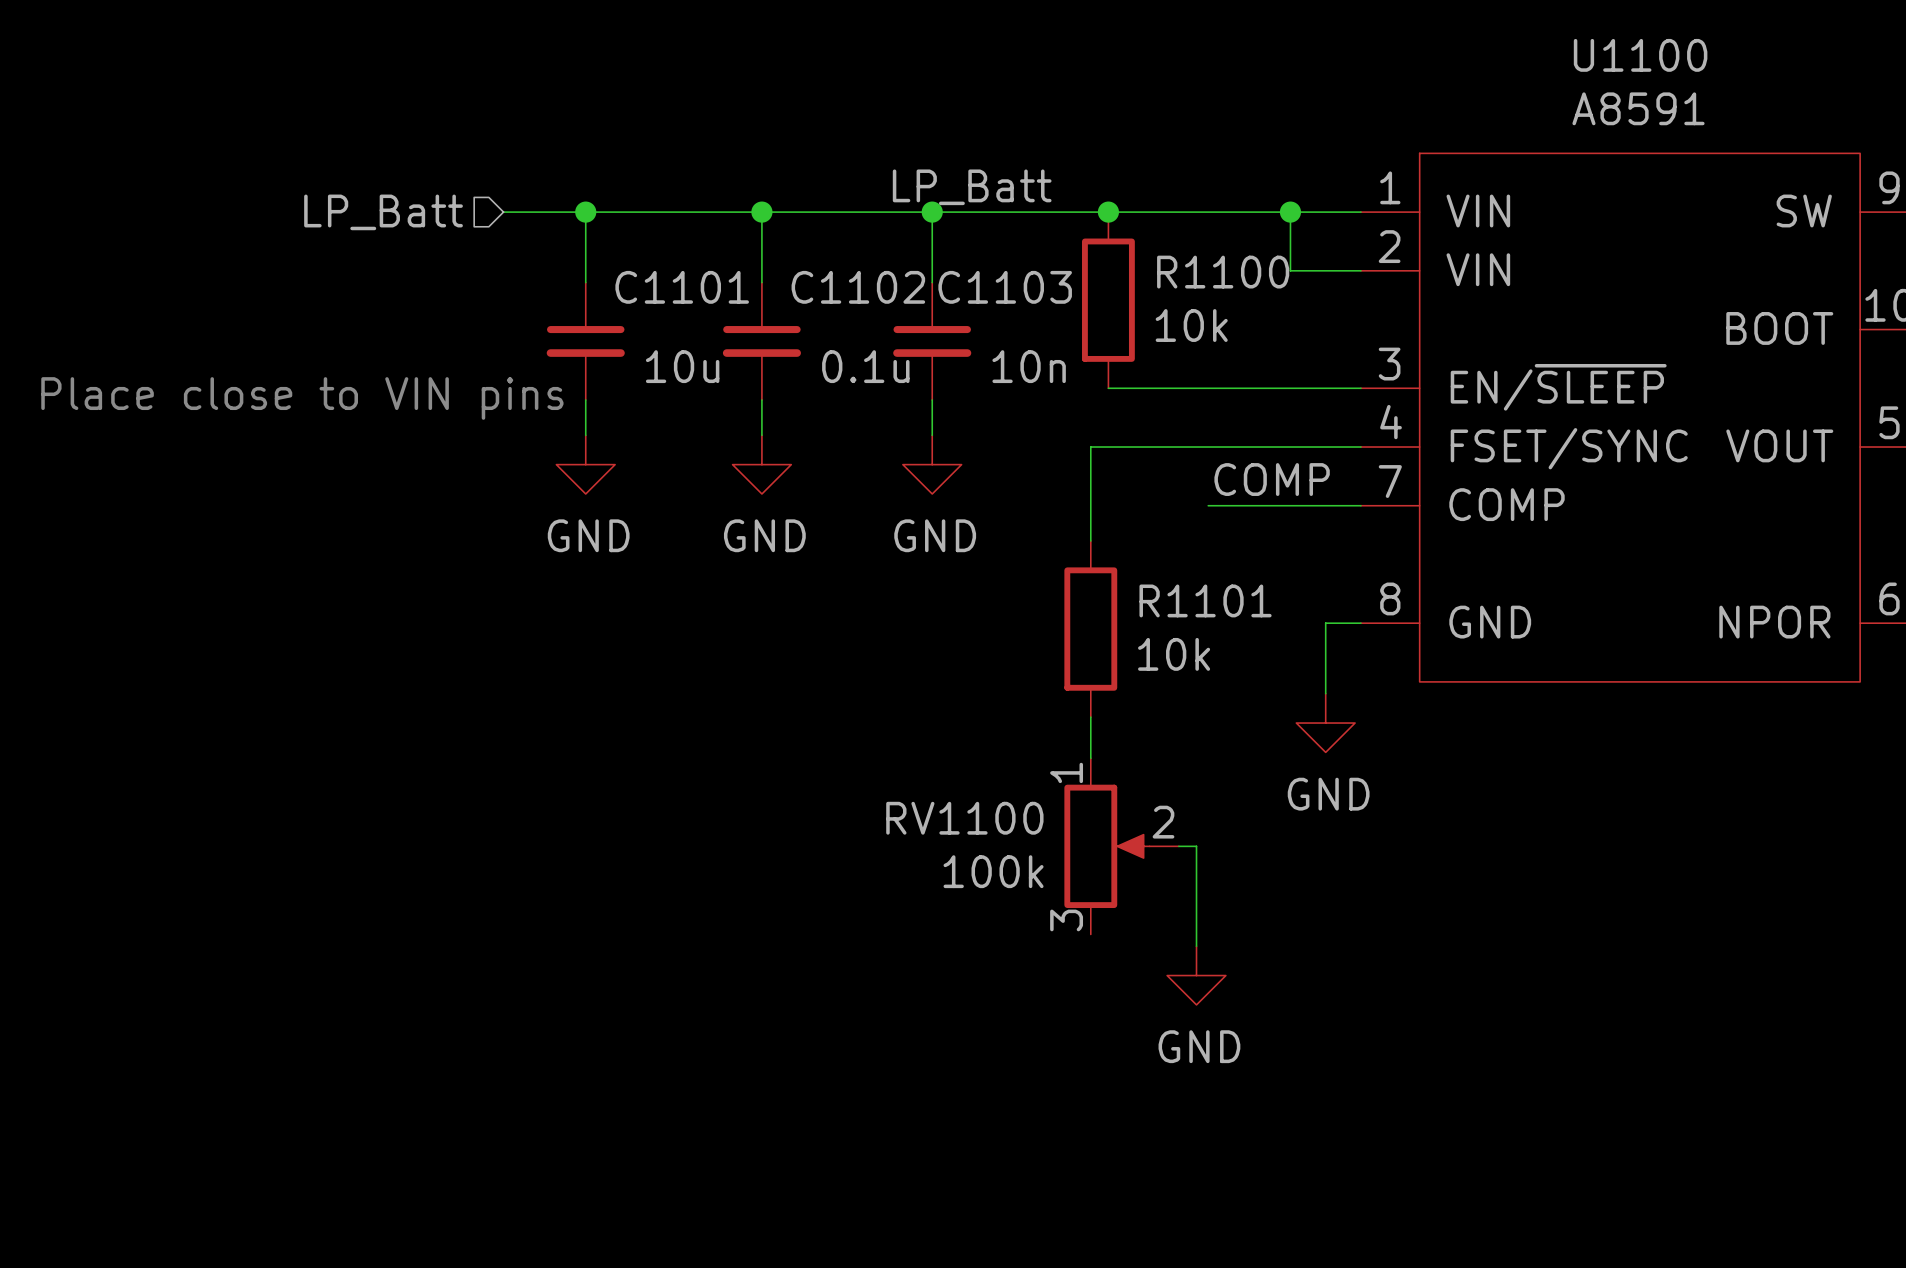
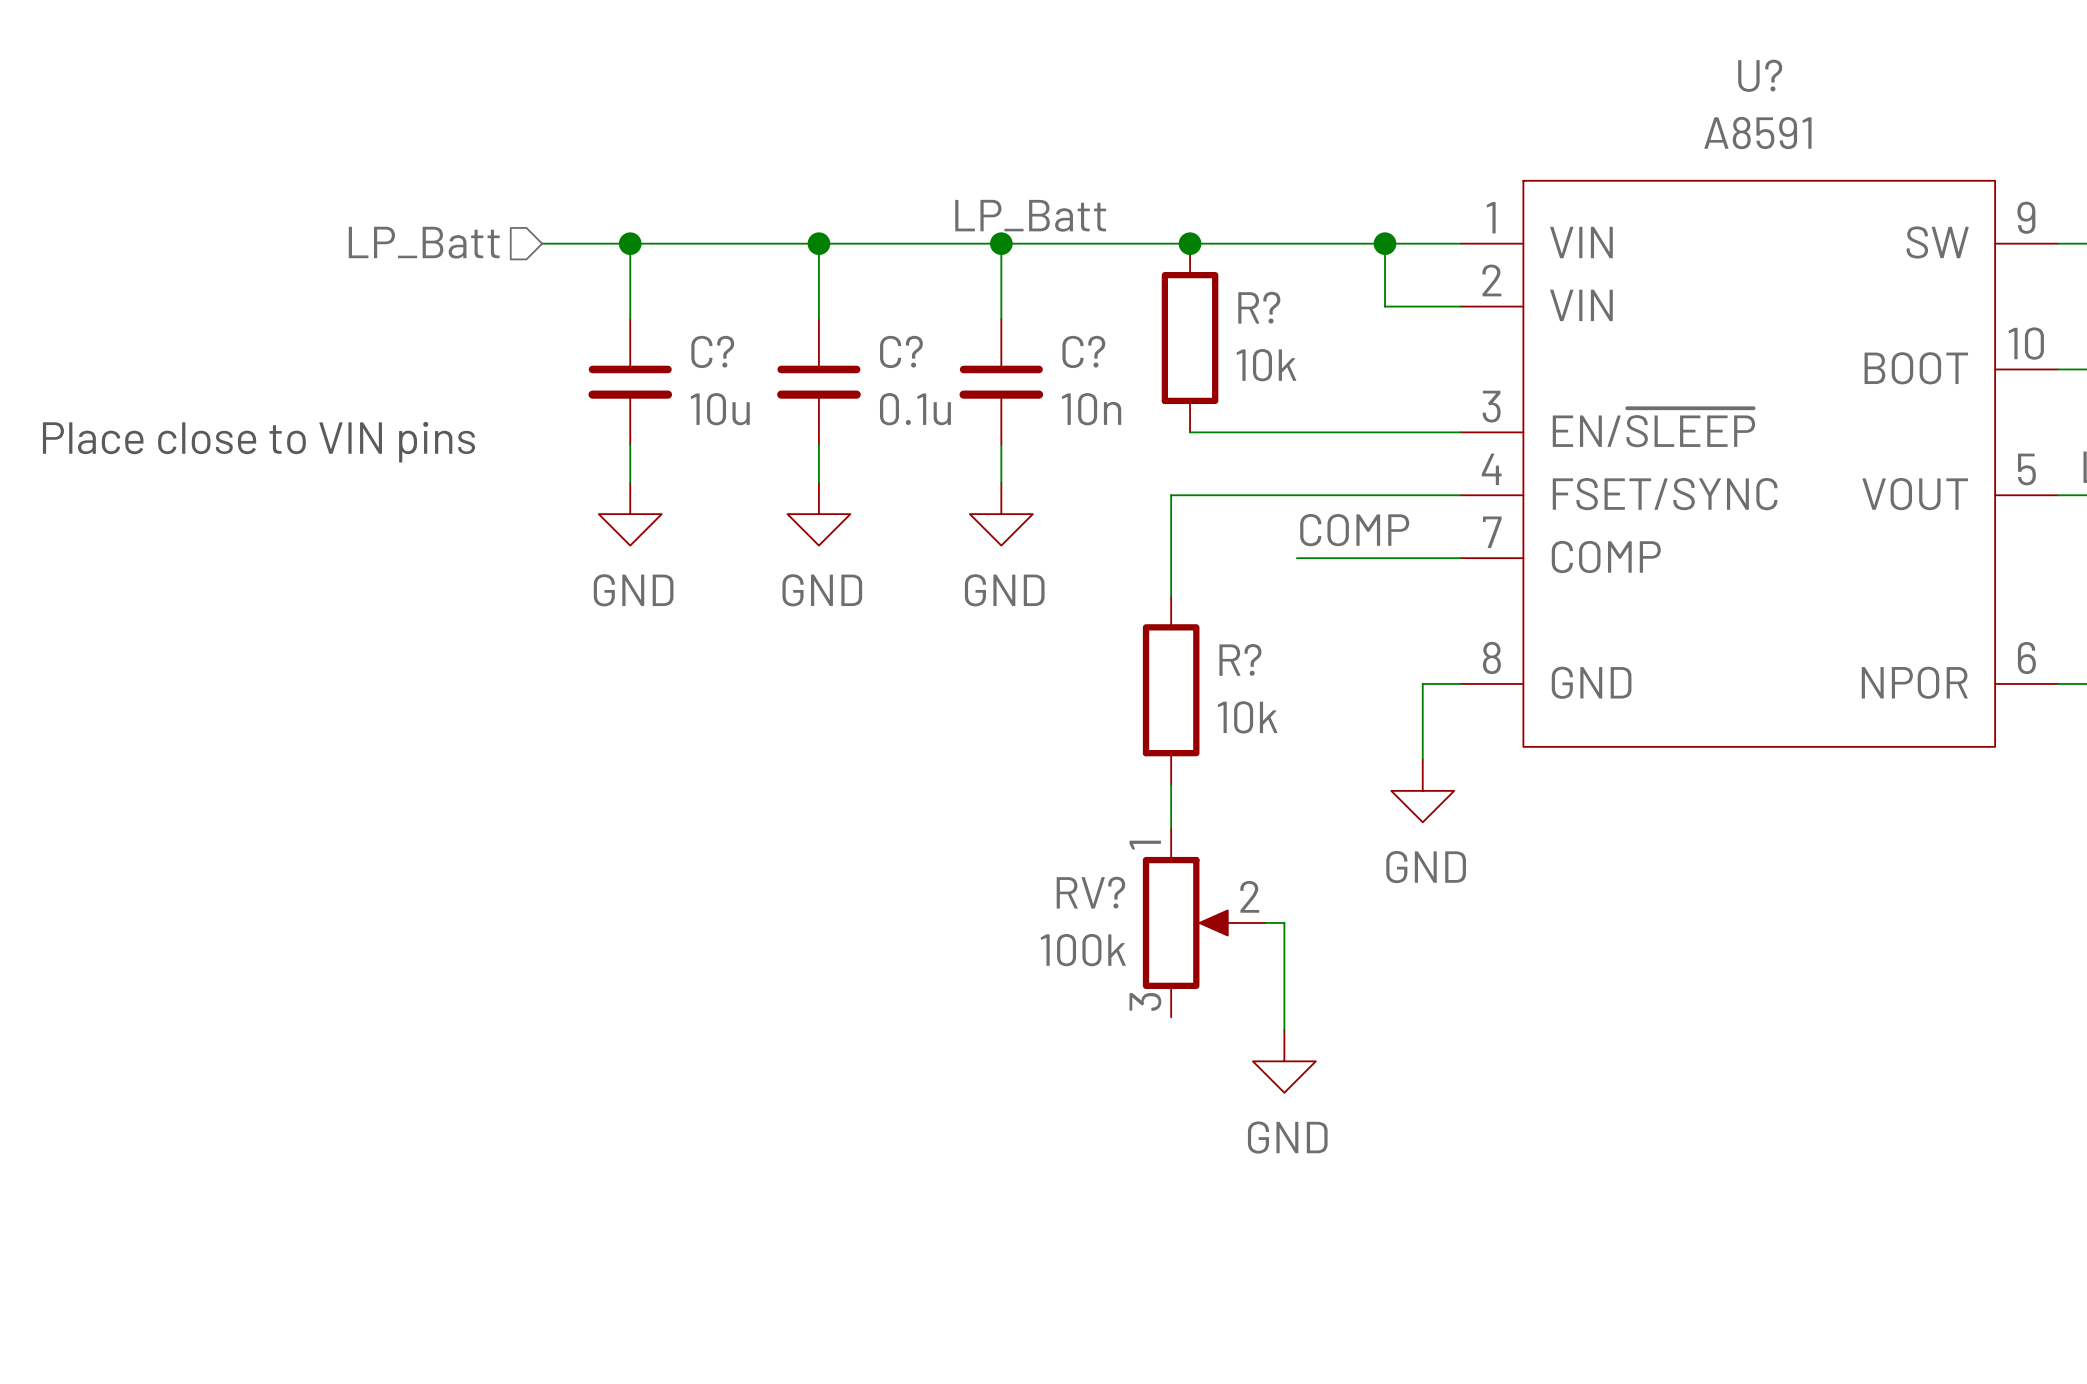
U1100 name: U1100 (1640, 55) -> U? (1760, 75)
R1100 name: R1100 (1223, 272) -> R? (1259, 307)
C1101 name: C1101 (682, 287) -> C? (712, 351)
C1102 name: C1102 (858, 287) -> C? (901, 351)
C1103 name: C1103 (1005, 287) -> C? (1083, 351)
R1101 name: R1101 (1205, 600) -> R? (1240, 659)
RV1100 name: RV1100 (964, 818) -> RV? (1090, 892)

